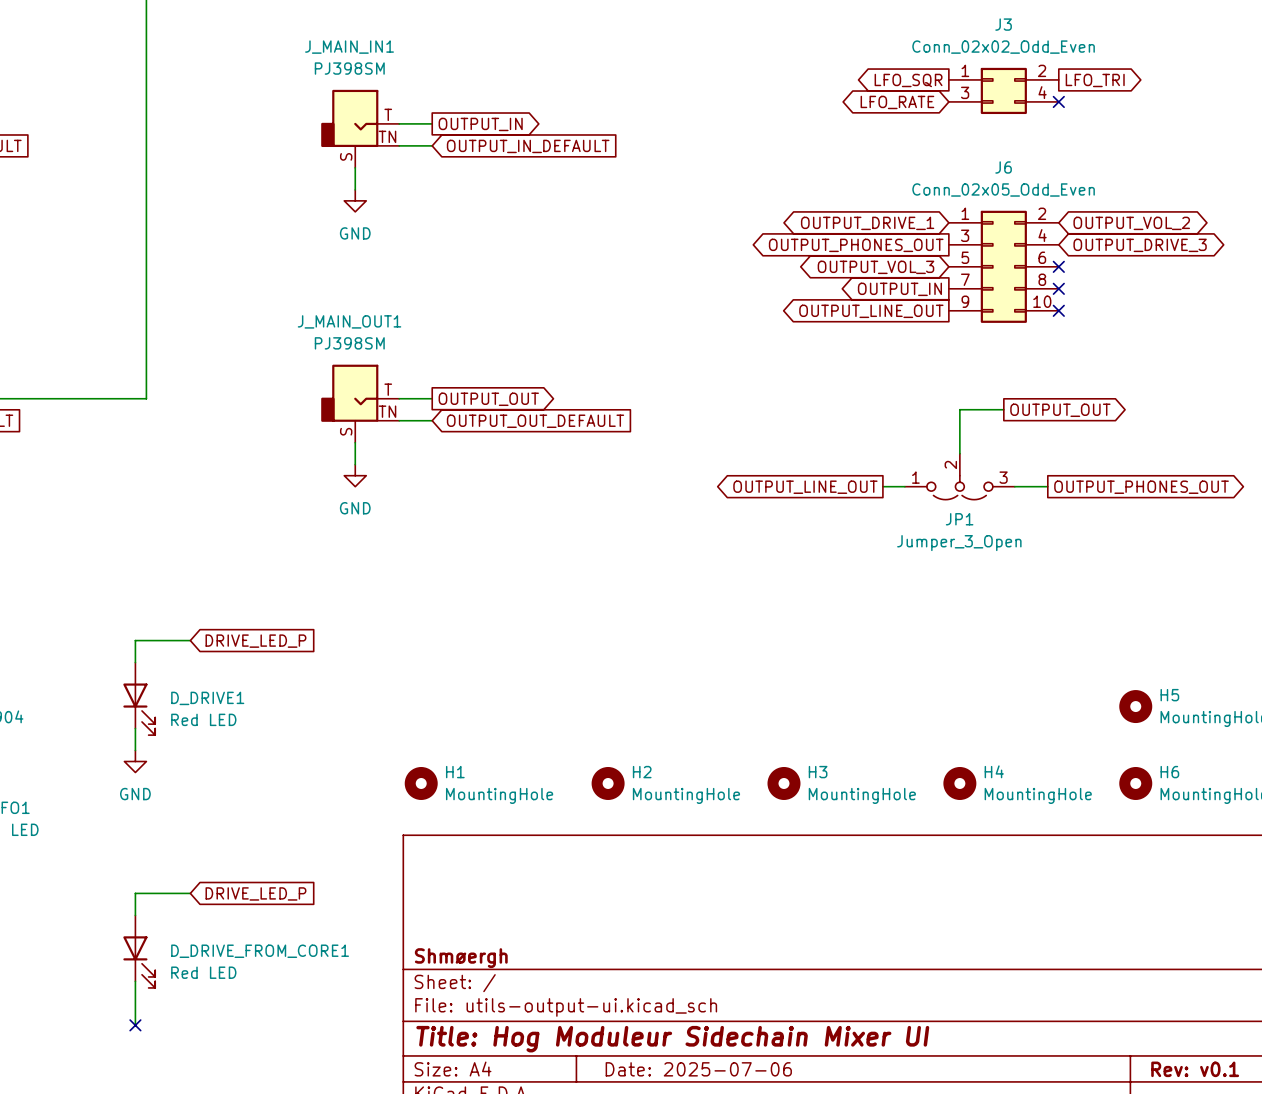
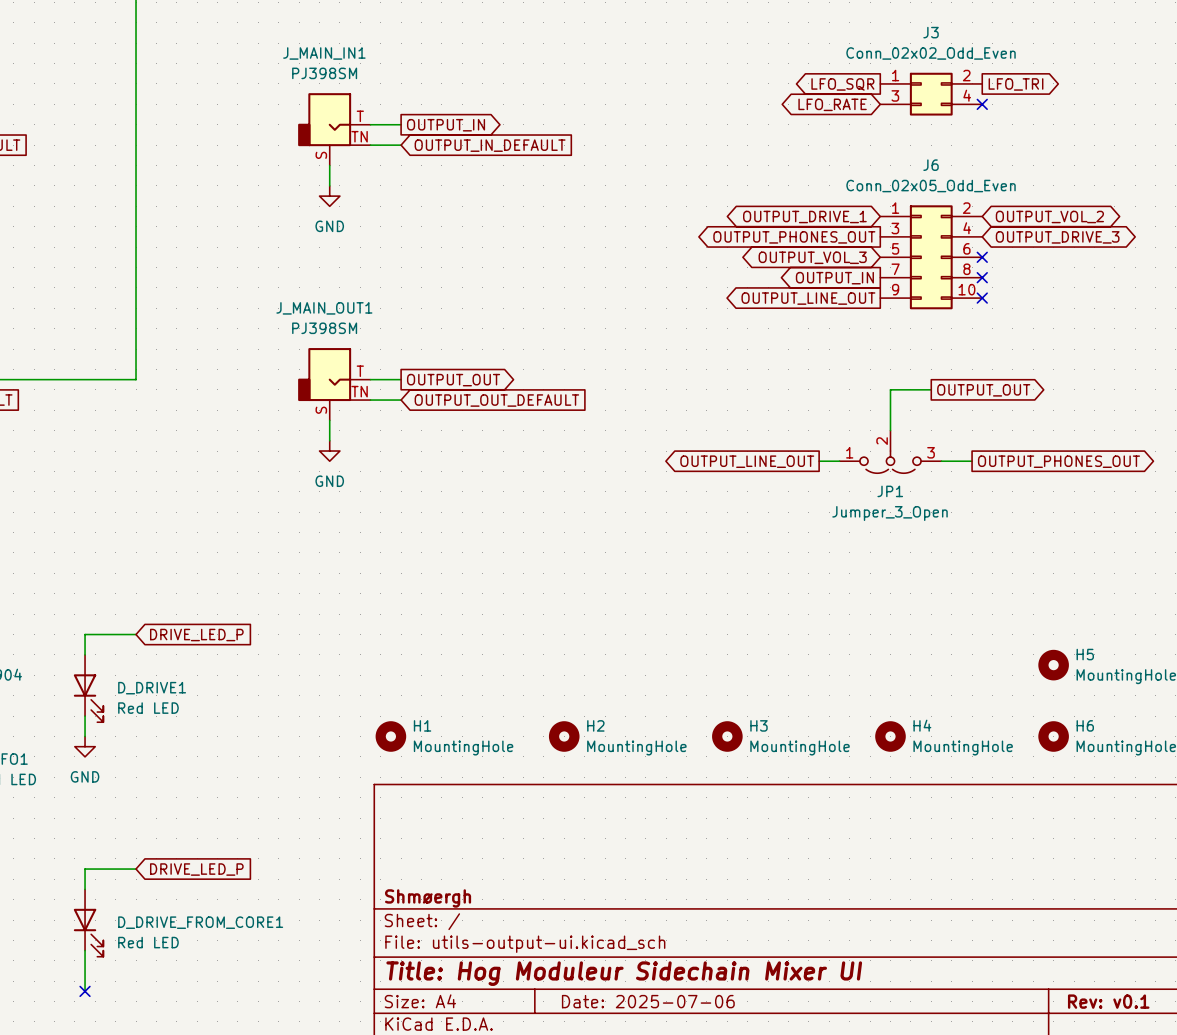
wire: (190, 640) (135, 640) (135, 662) -> (136, 634) (85, 634) (85, 654)
global label position: DRIVE_LED_P (255, 641) -> DRIVE_LED_P (196, 635)
D_DRIVE1 position: (139, 698) -> (88, 688)
wire: (135, 728) (135, 750) -> (85, 716) (85, 736)
power symbol position: GND (135, 761) -> GND (85, 746)
wire: (190, 893) (135, 893) (135, 915) -> (136, 869) (85, 869) (85, 889)
global label position: DRIVE_LED_P (255, 893) -> DRIVE_LED_P (196, 869)
D_DRIVE_FROM_CORE1 position: (139, 951) -> (88, 923)
wire: (135, 981) (135, 1025) -> (85, 950) (85, 991)
no-connect mark: (135, 1025) -> none
no-connect mark: none -> (85, 991)

